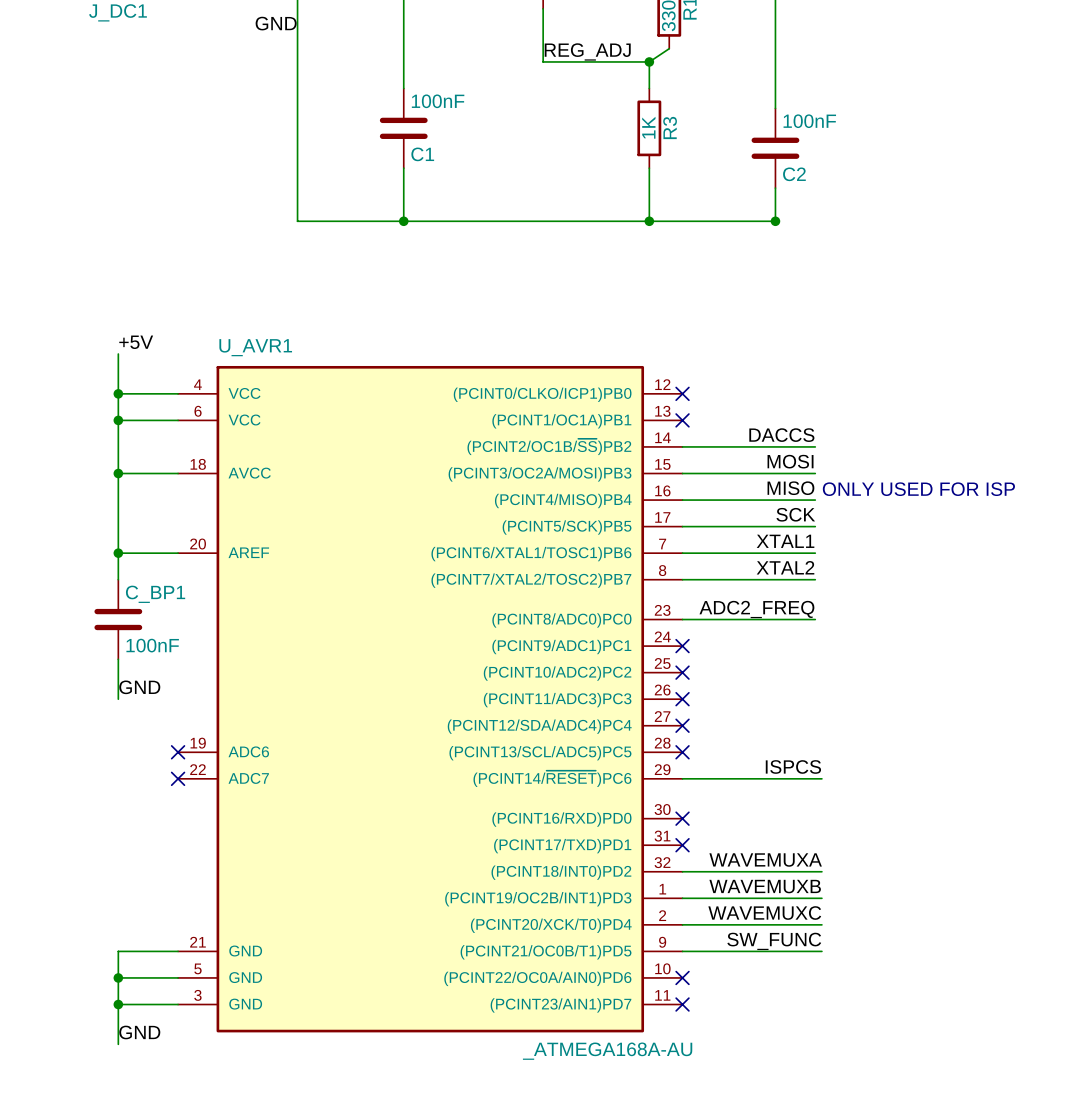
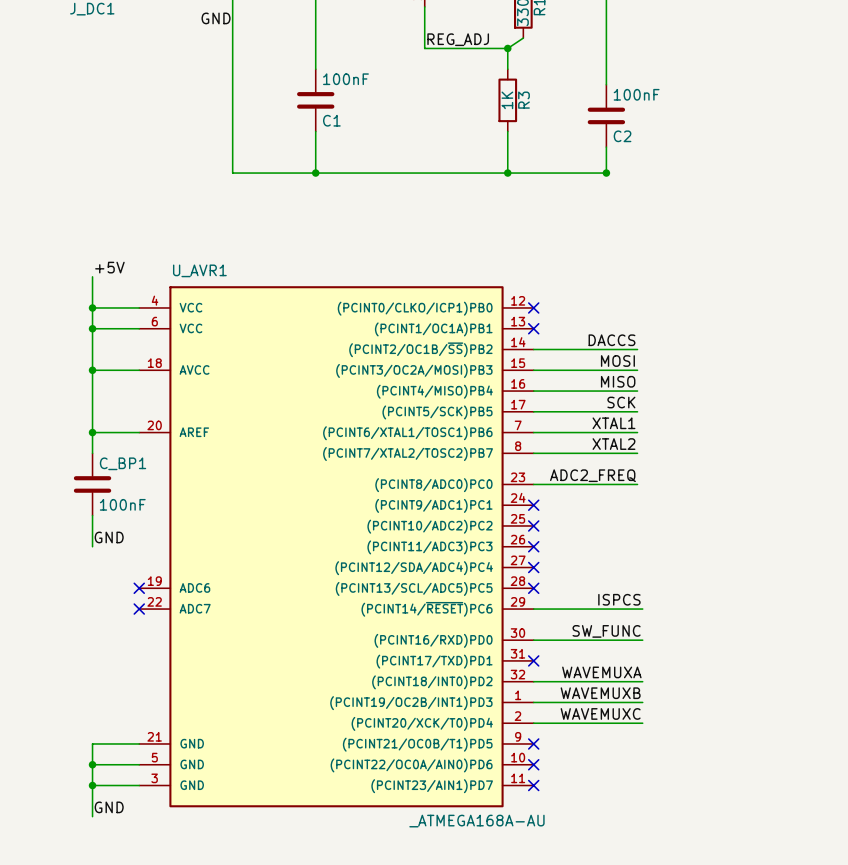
text: ONLY USED FOR ISP (918, 489) -> none
no-connect mark: (682, 818) -> none
label position: SW_FUNC (774, 941) -> SW_FUNC (606, 631)
wire: (682, 951) (821, 951) -> (533, 640) (642, 640)
no-connect mark: none -> (533, 743)

